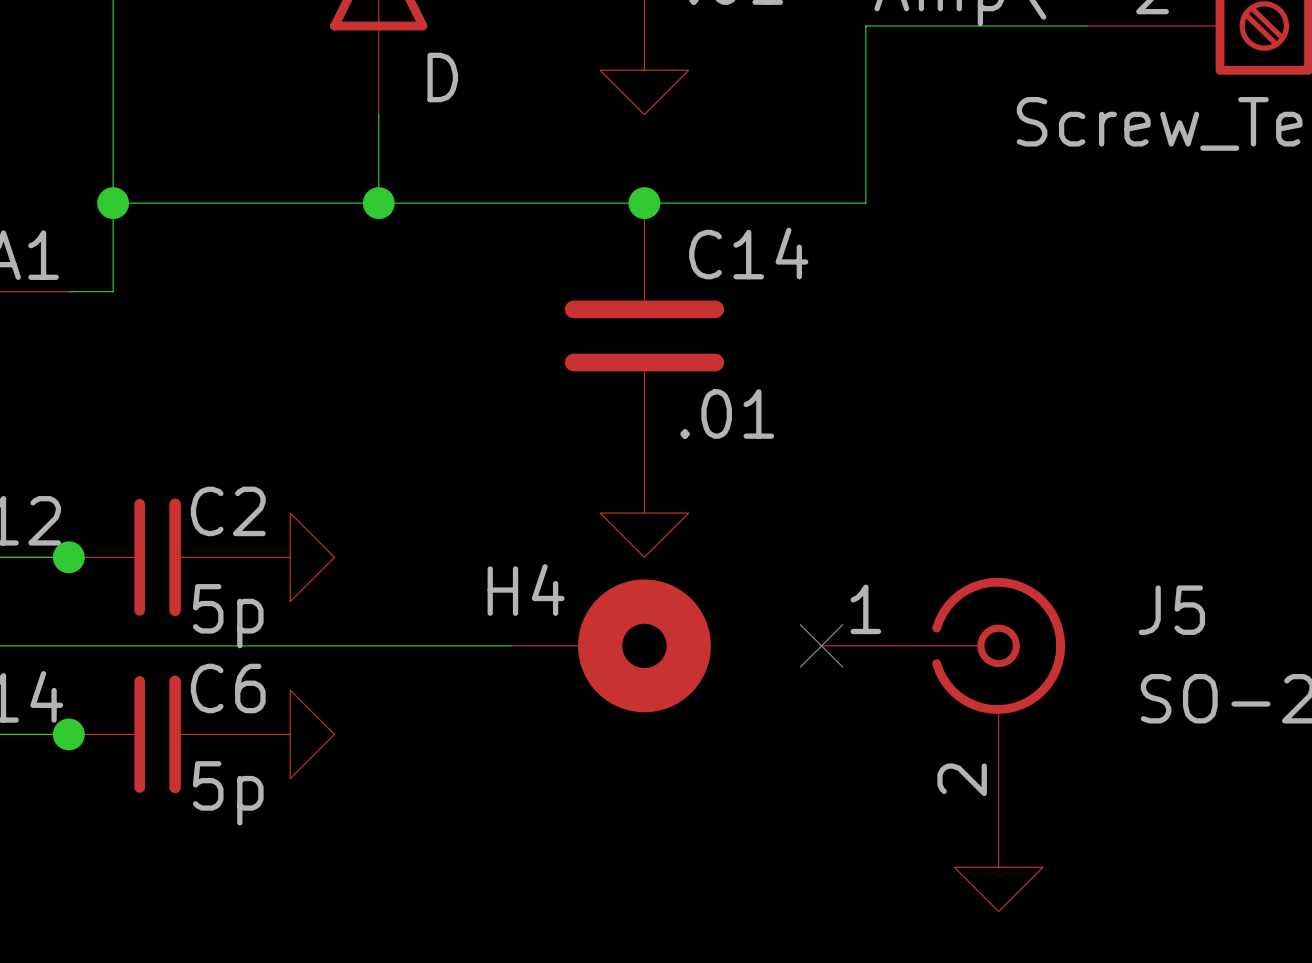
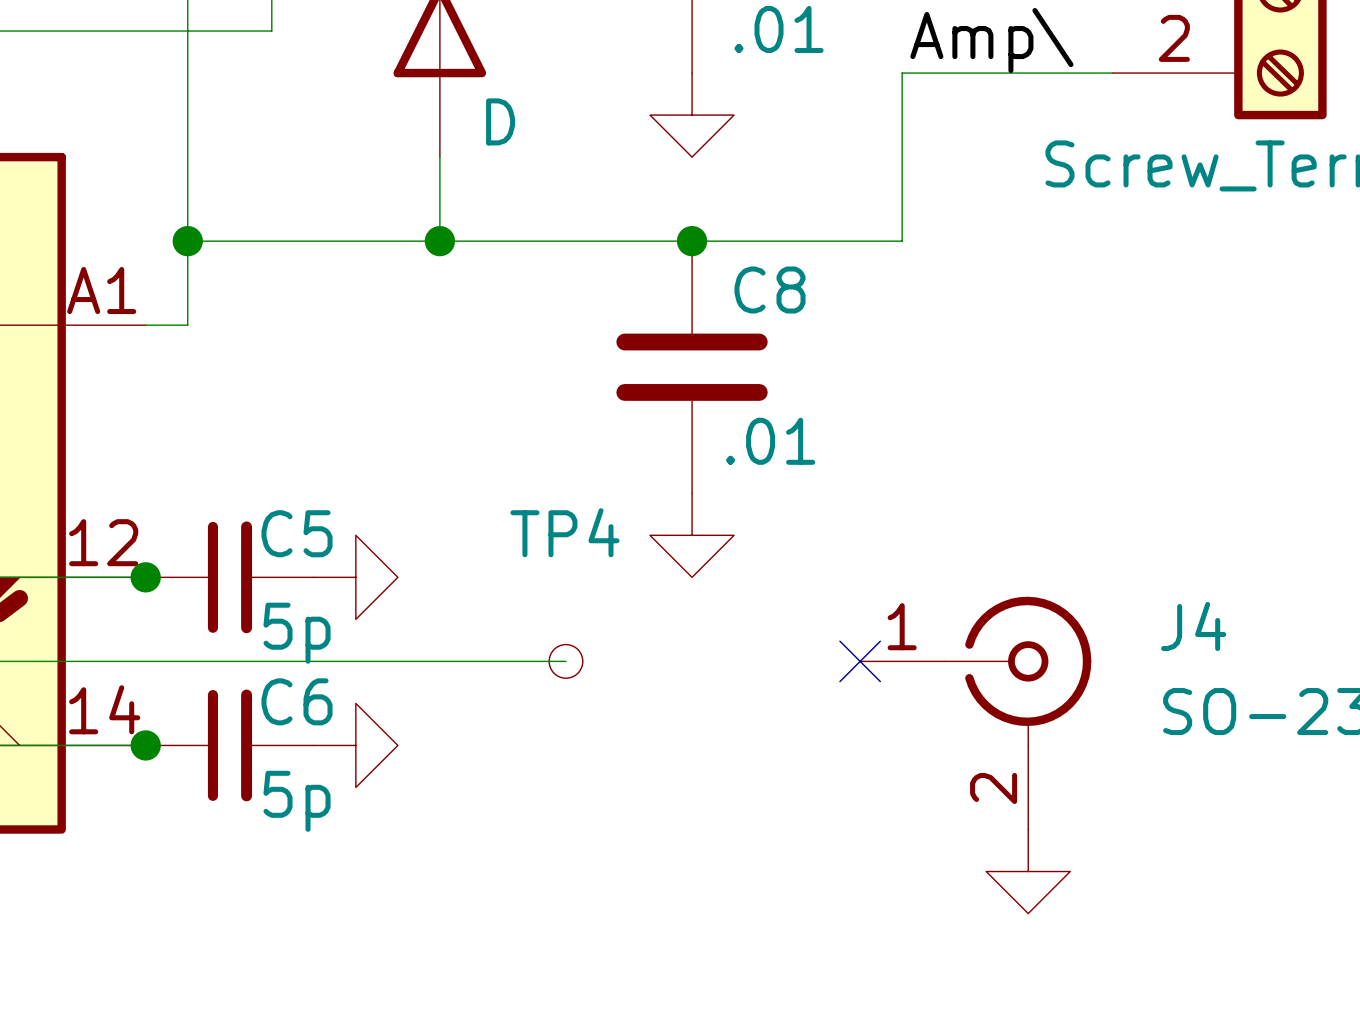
C14 name: C14 (748, 253) -> C8 (770, 290)
C2 name: C2 (228, 511) -> C5 (297, 533)
J5 name: J5 (1171, 610) -> J4 (1193, 626)
TP4: none -> (565, 661)
H4: (611, 645) -> none

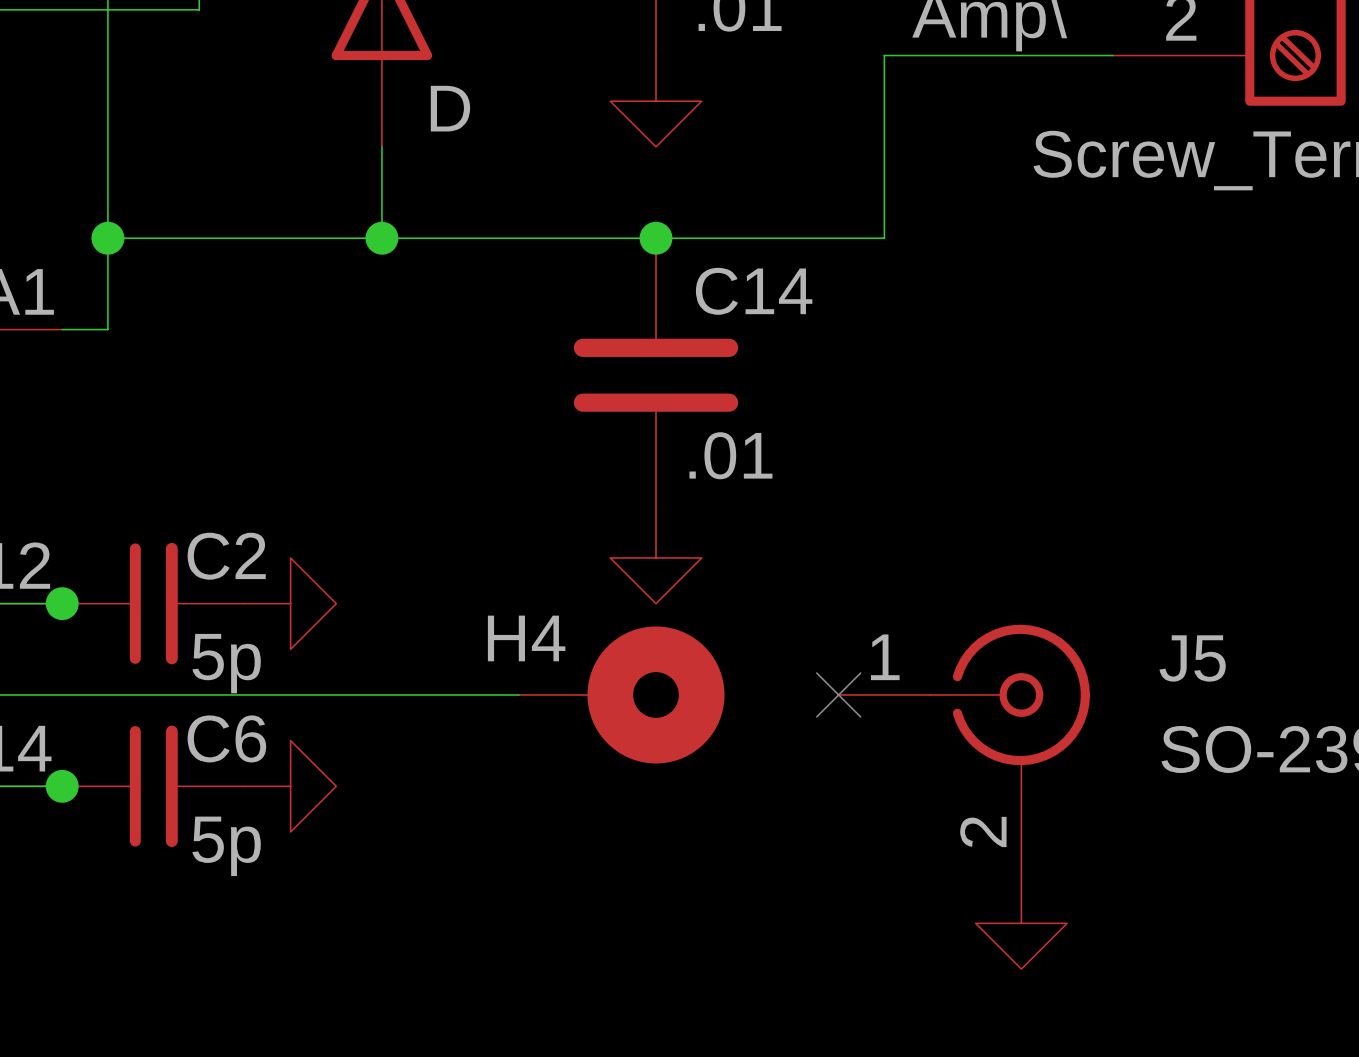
C8 name: C8 (770, 290) -> C14 (754, 291)
C5 name: C5 (297, 533) -> C2 (226, 556)
J4 name: J4 (1193, 626) -> J5 (1192, 658)
TP4: (565, 661) -> none
H4: none -> (621, 694)

